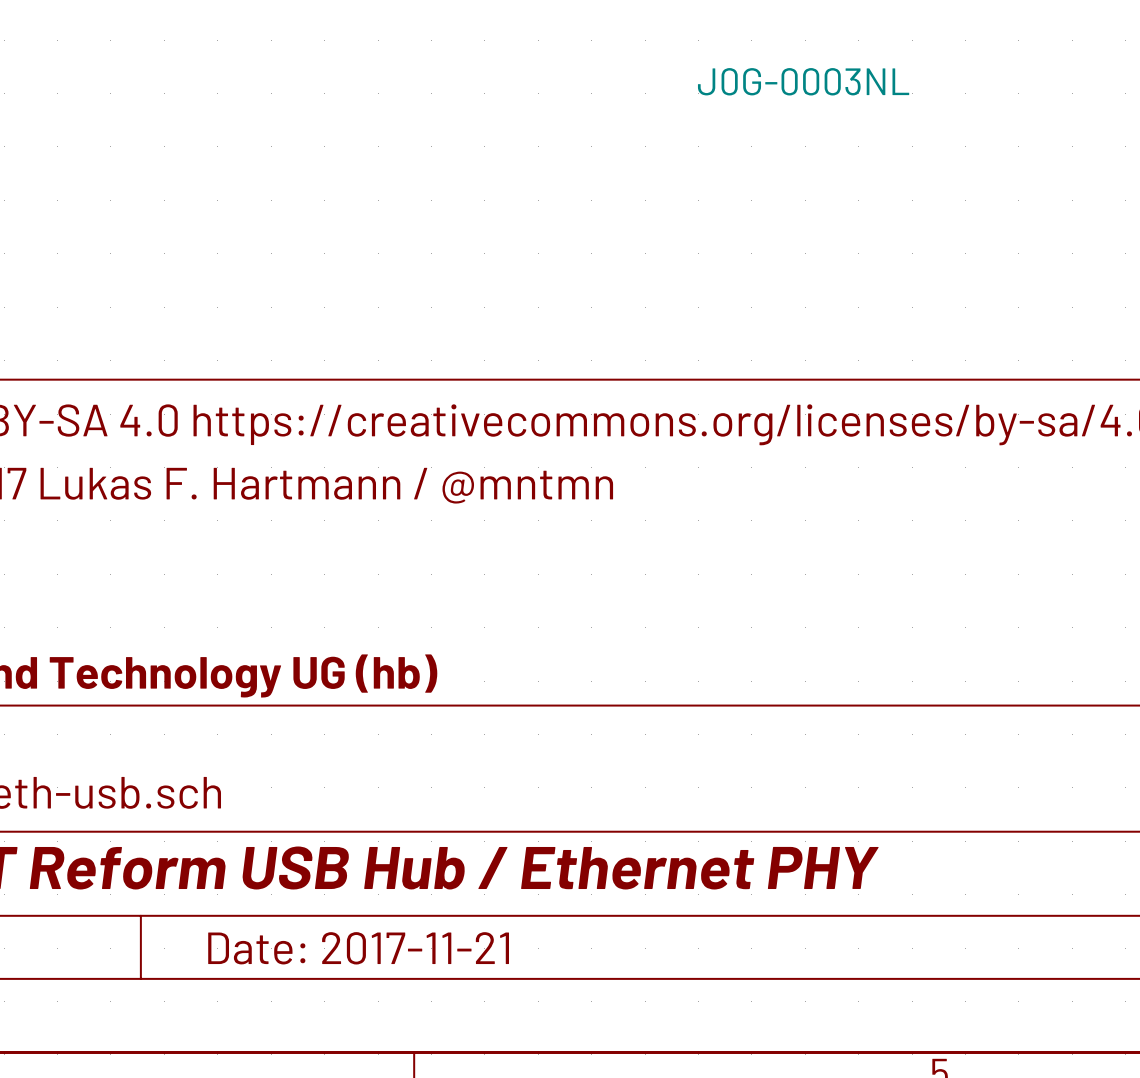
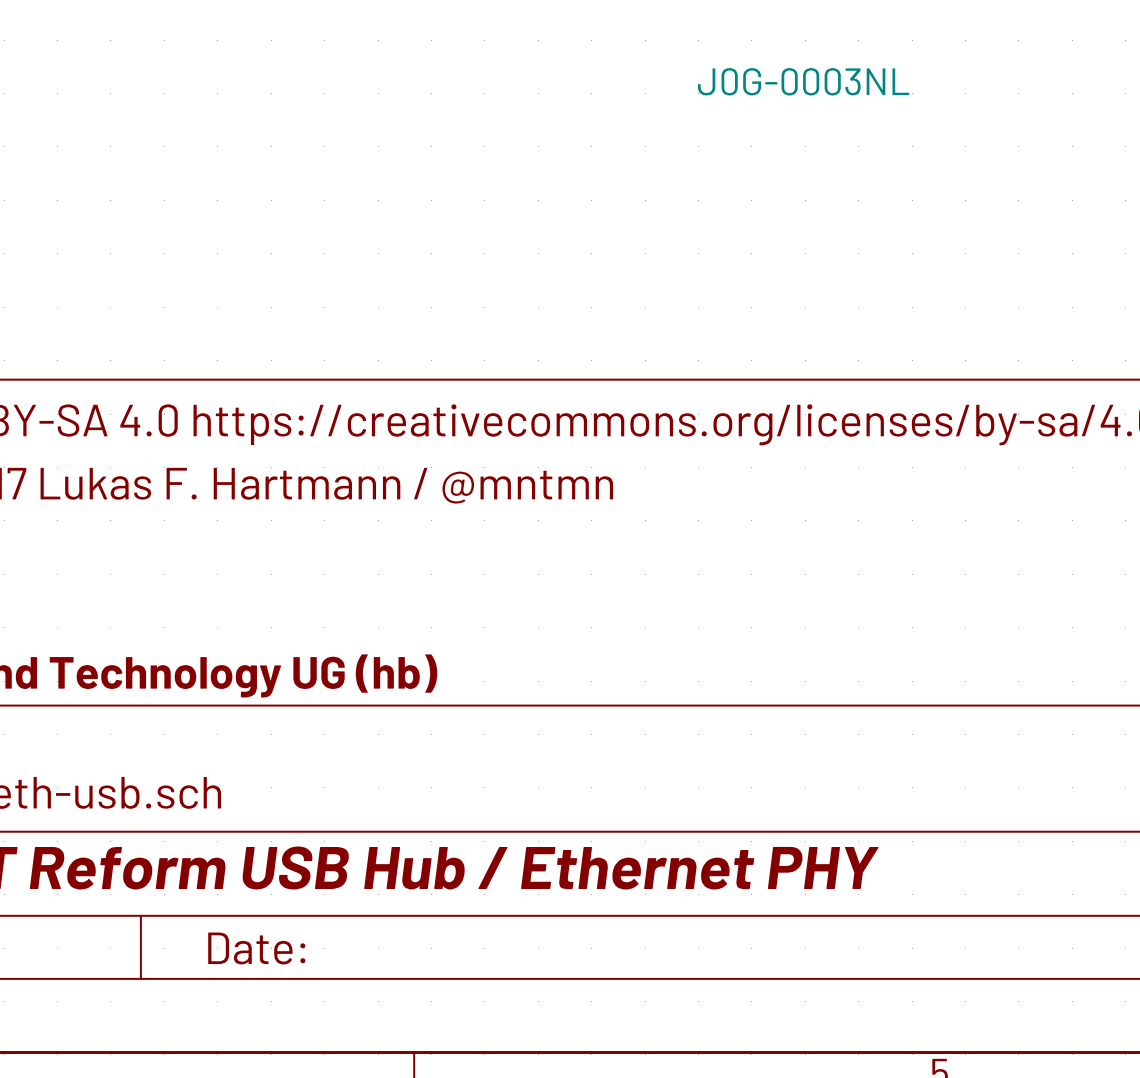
title block: Date: 2017-11-21 (358, 948) -> Date: (256, 948)

